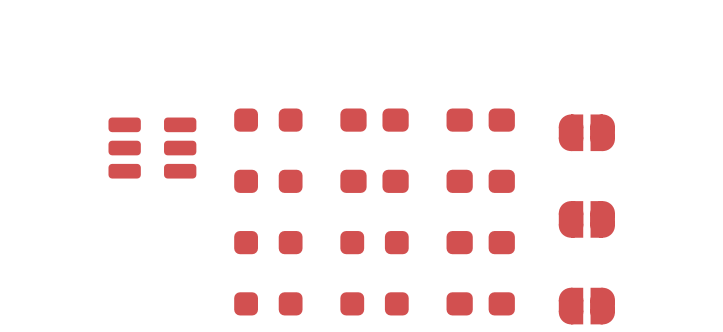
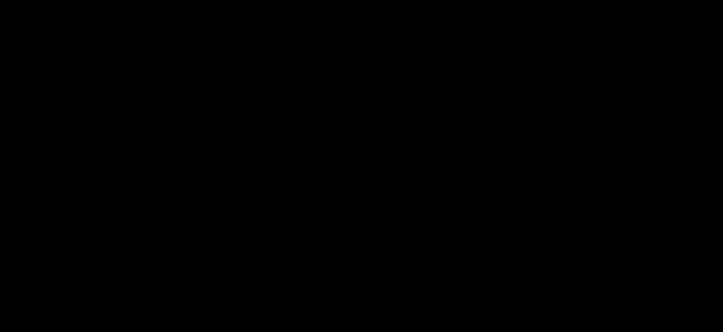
part: (268, 120) -> none
part: (374, 120) -> none
part: (480, 120) -> none
part: (586, 132) -> none
part: (152, 148) -> none
part: (268, 181) -> none
part: (374, 181) -> none
part: (480, 181) -> none
part: (586, 219) -> none
part: (268, 242) -> none
part: (374, 242) -> none
part: (480, 242) -> none
part: (268, 303) -> none
part: (374, 303) -> none
part: (480, 303) -> none
part: (586, 306) -> none

